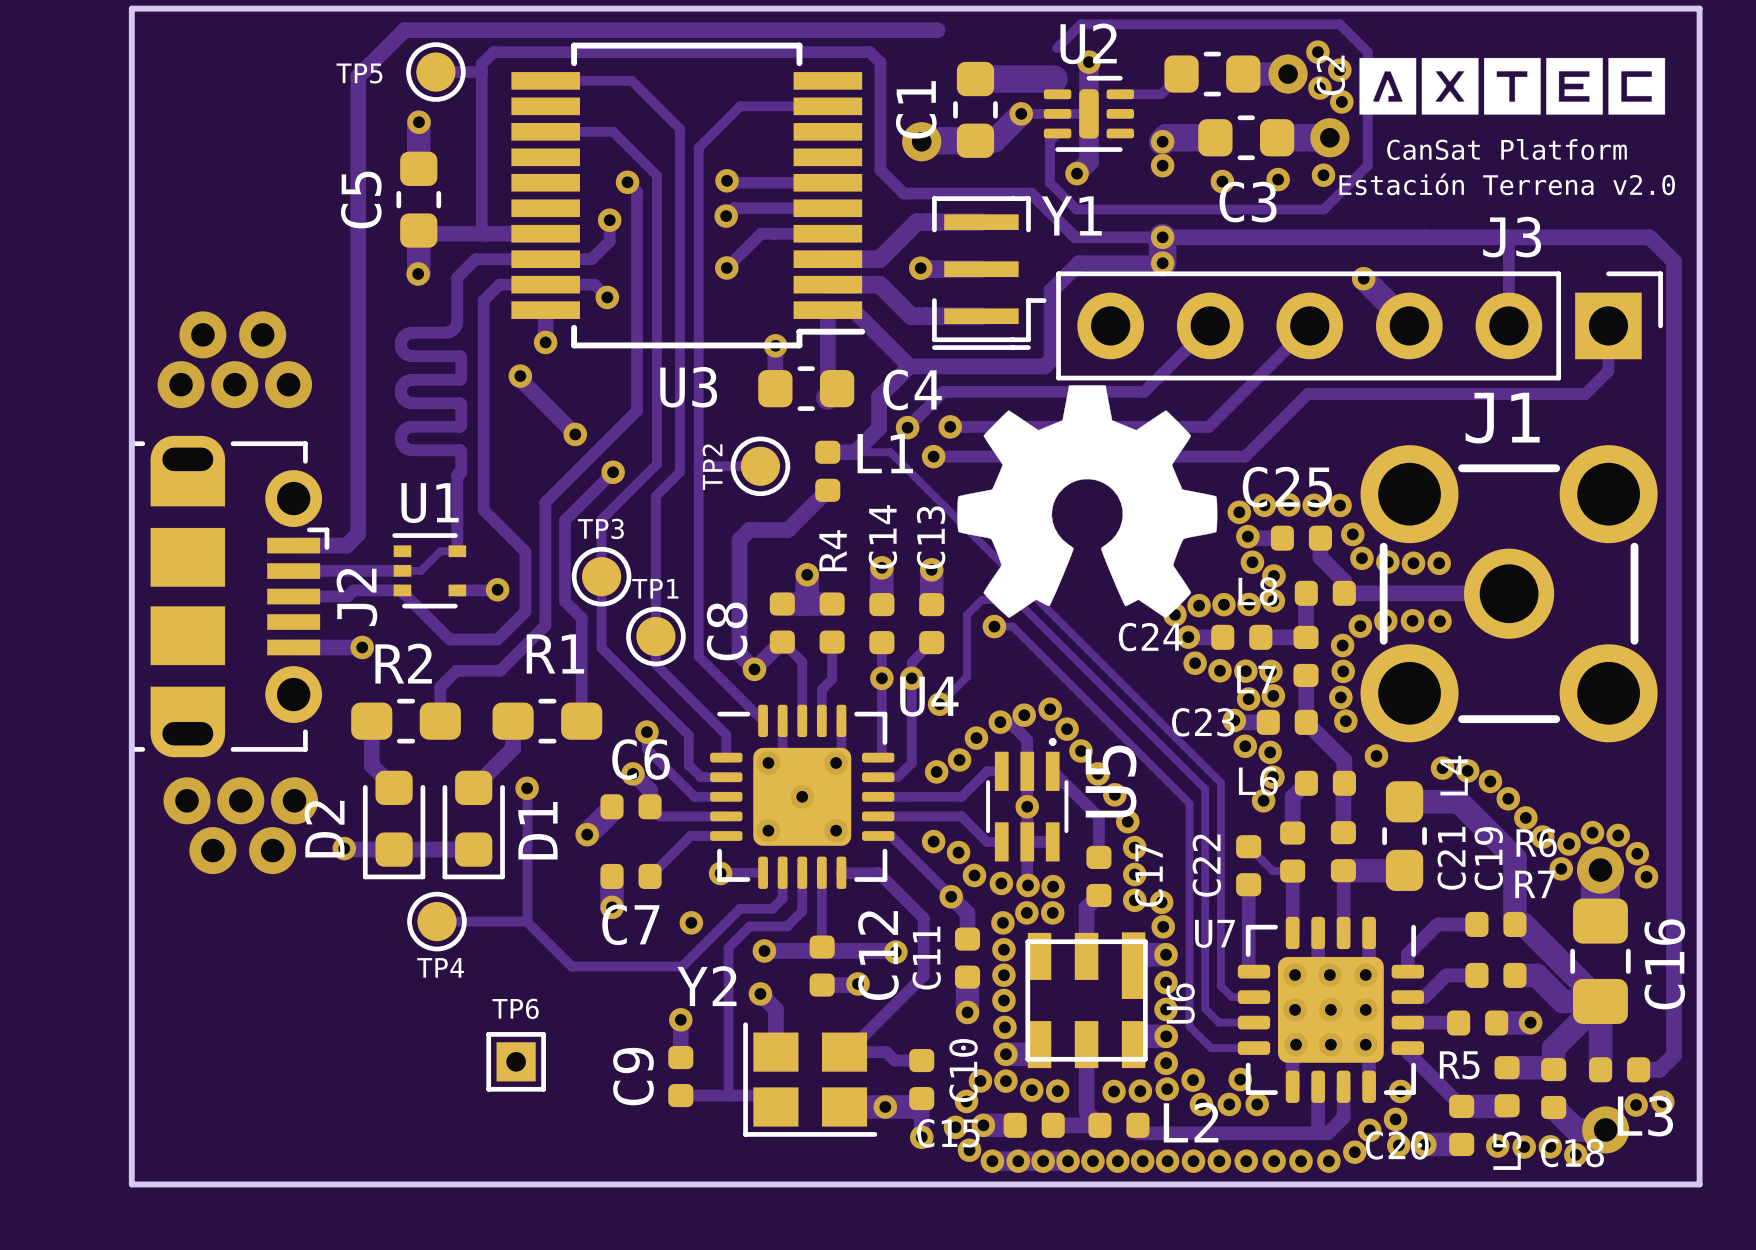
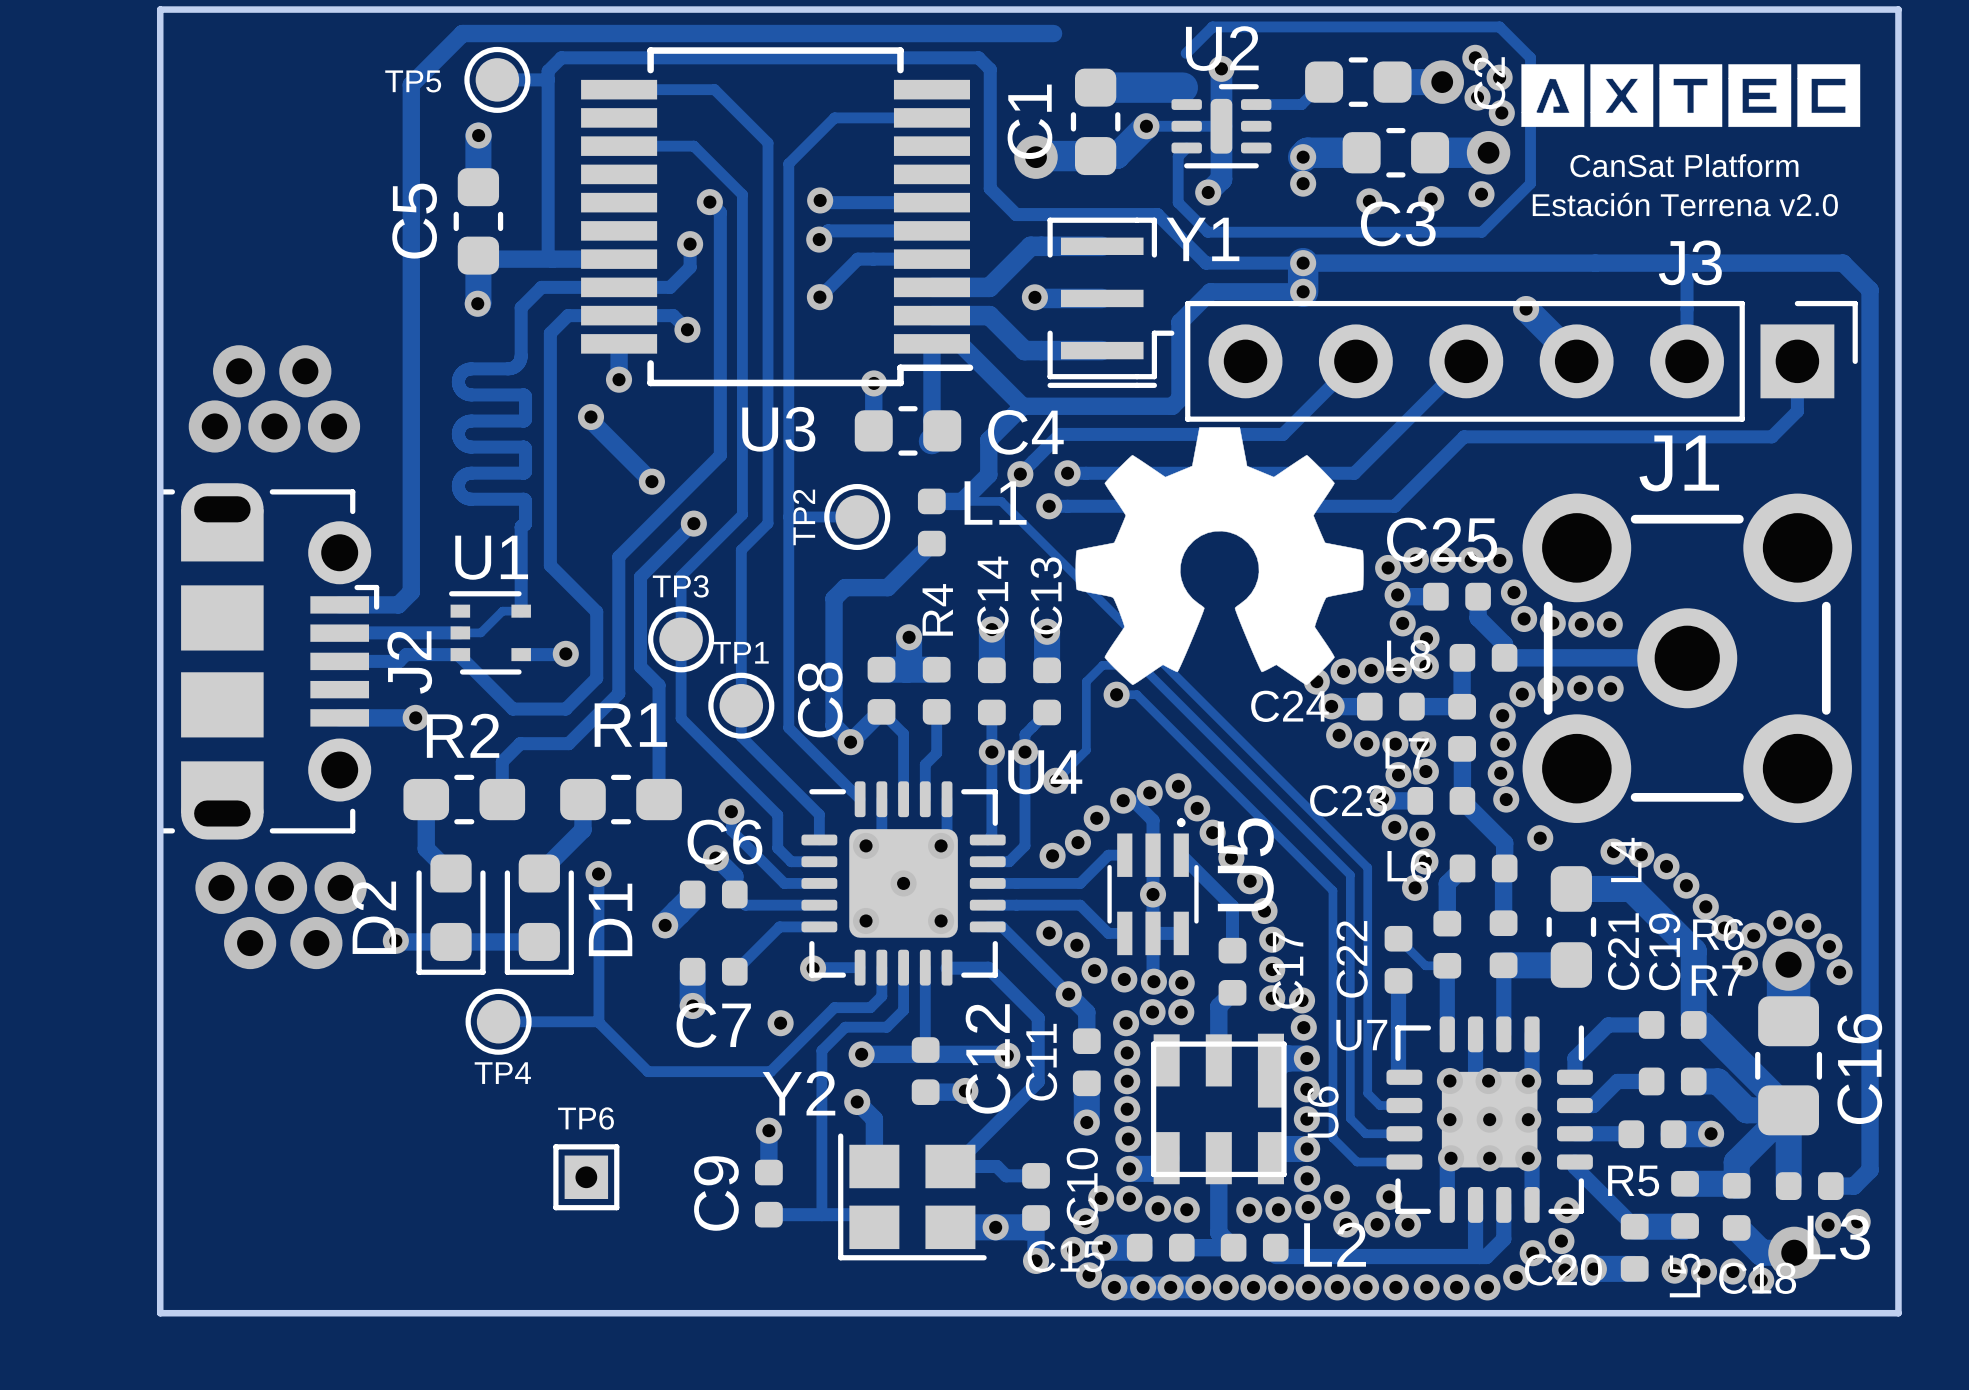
U7 footprint: [1237, 916, 1424, 1103] -> [1386, 1016, 1593, 1223]

